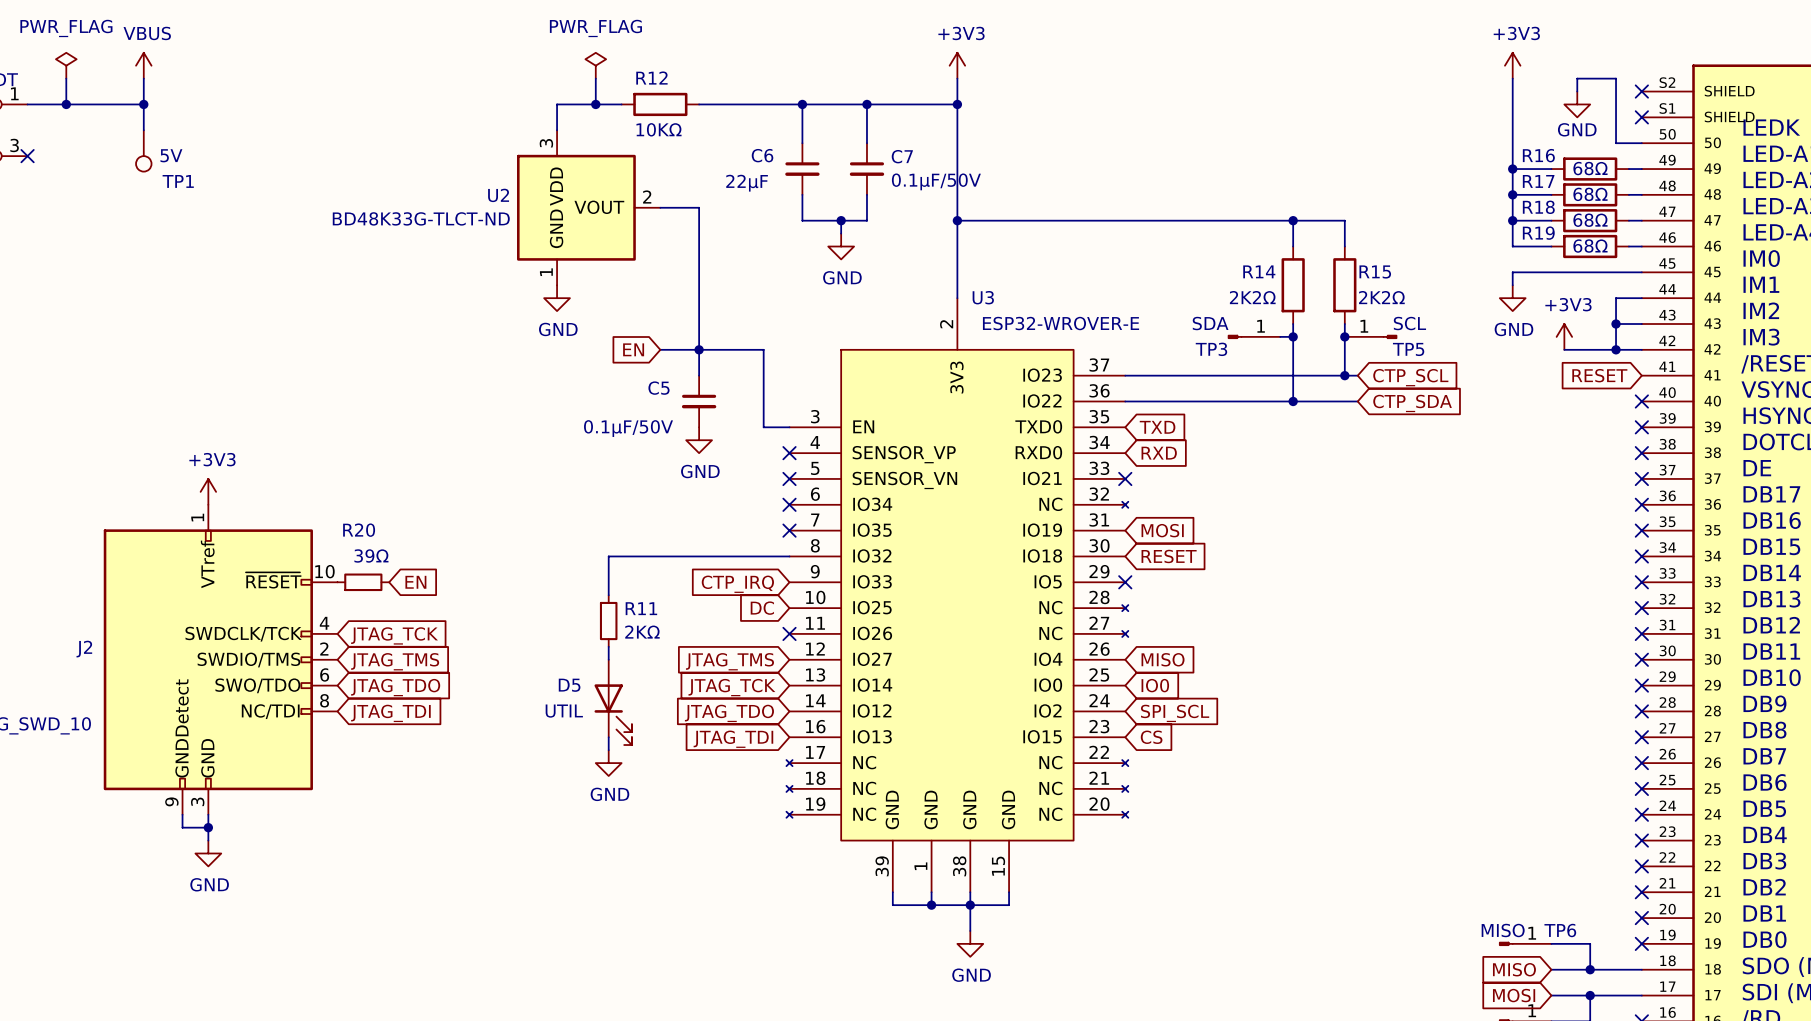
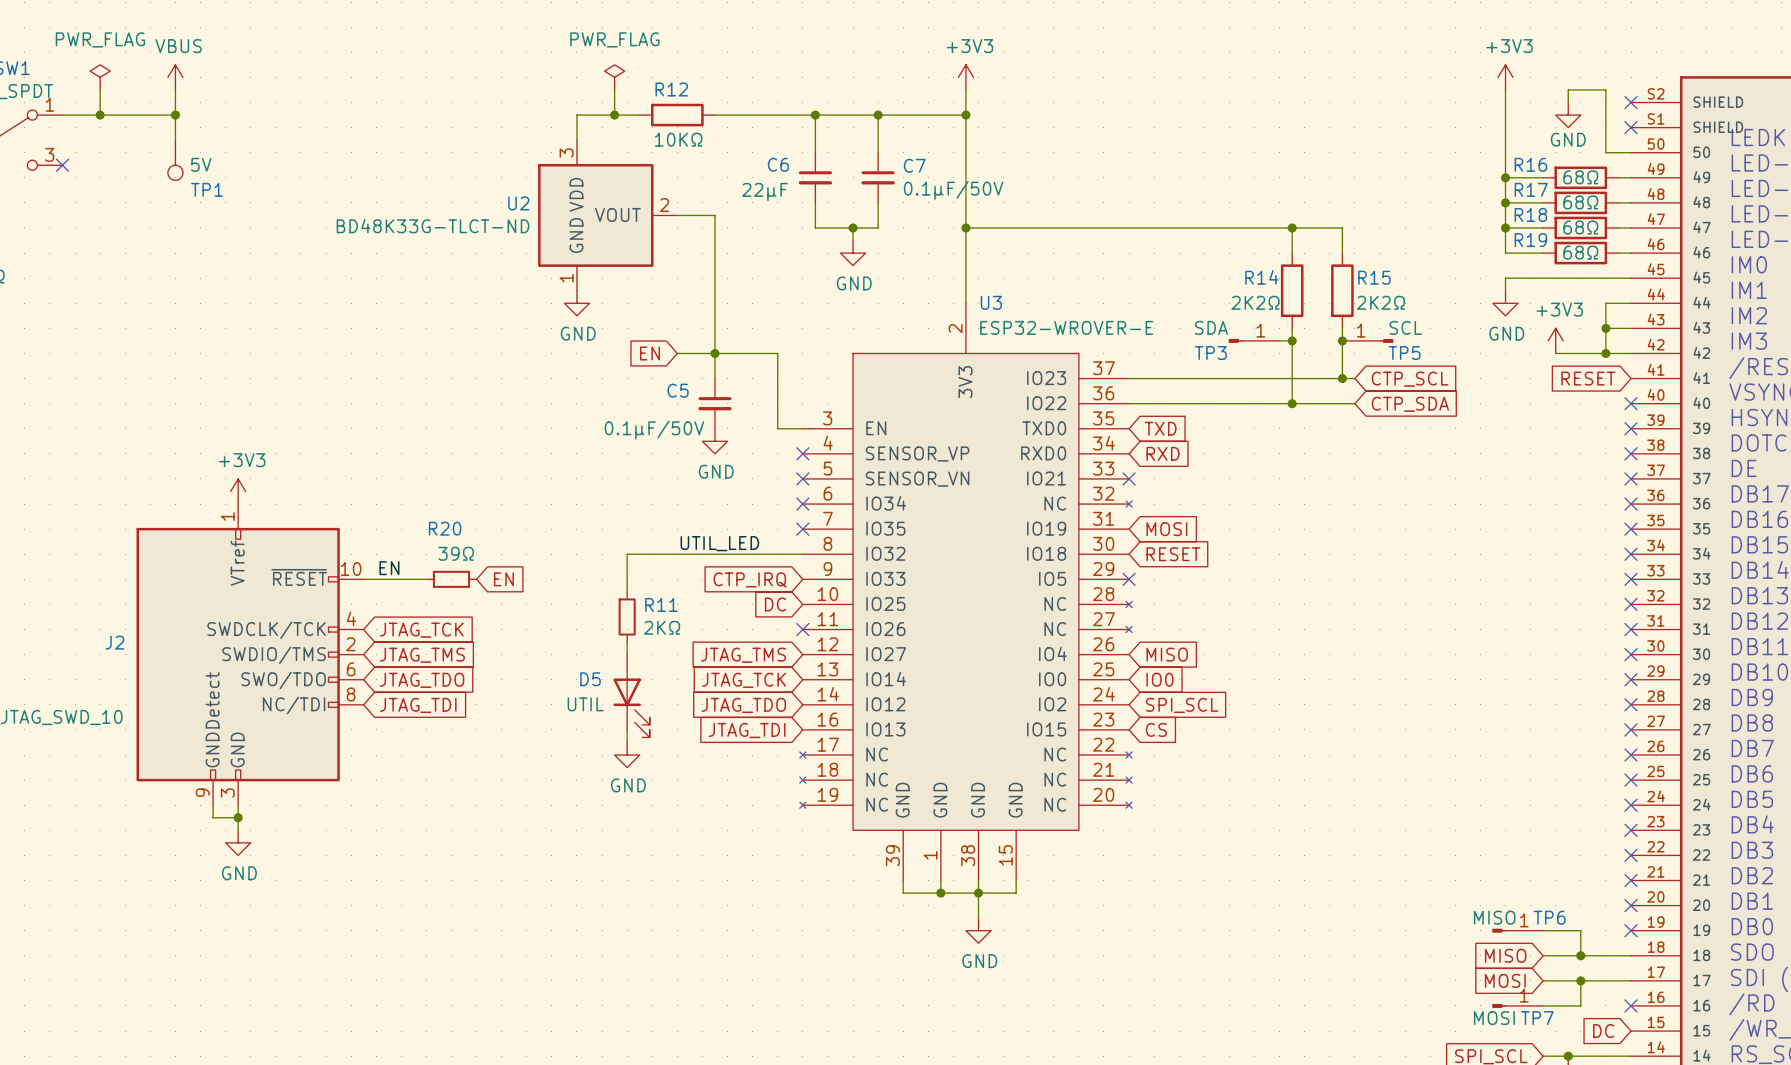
label: none -> UTIL_LED (719, 543)
label: none -> EN (389, 568)
wire: none -> (363, 579) (426, 579)
R20 position: (363, 582) -> (451, 579)
global label position: EN (415, 582) -> EN (503, 579)

